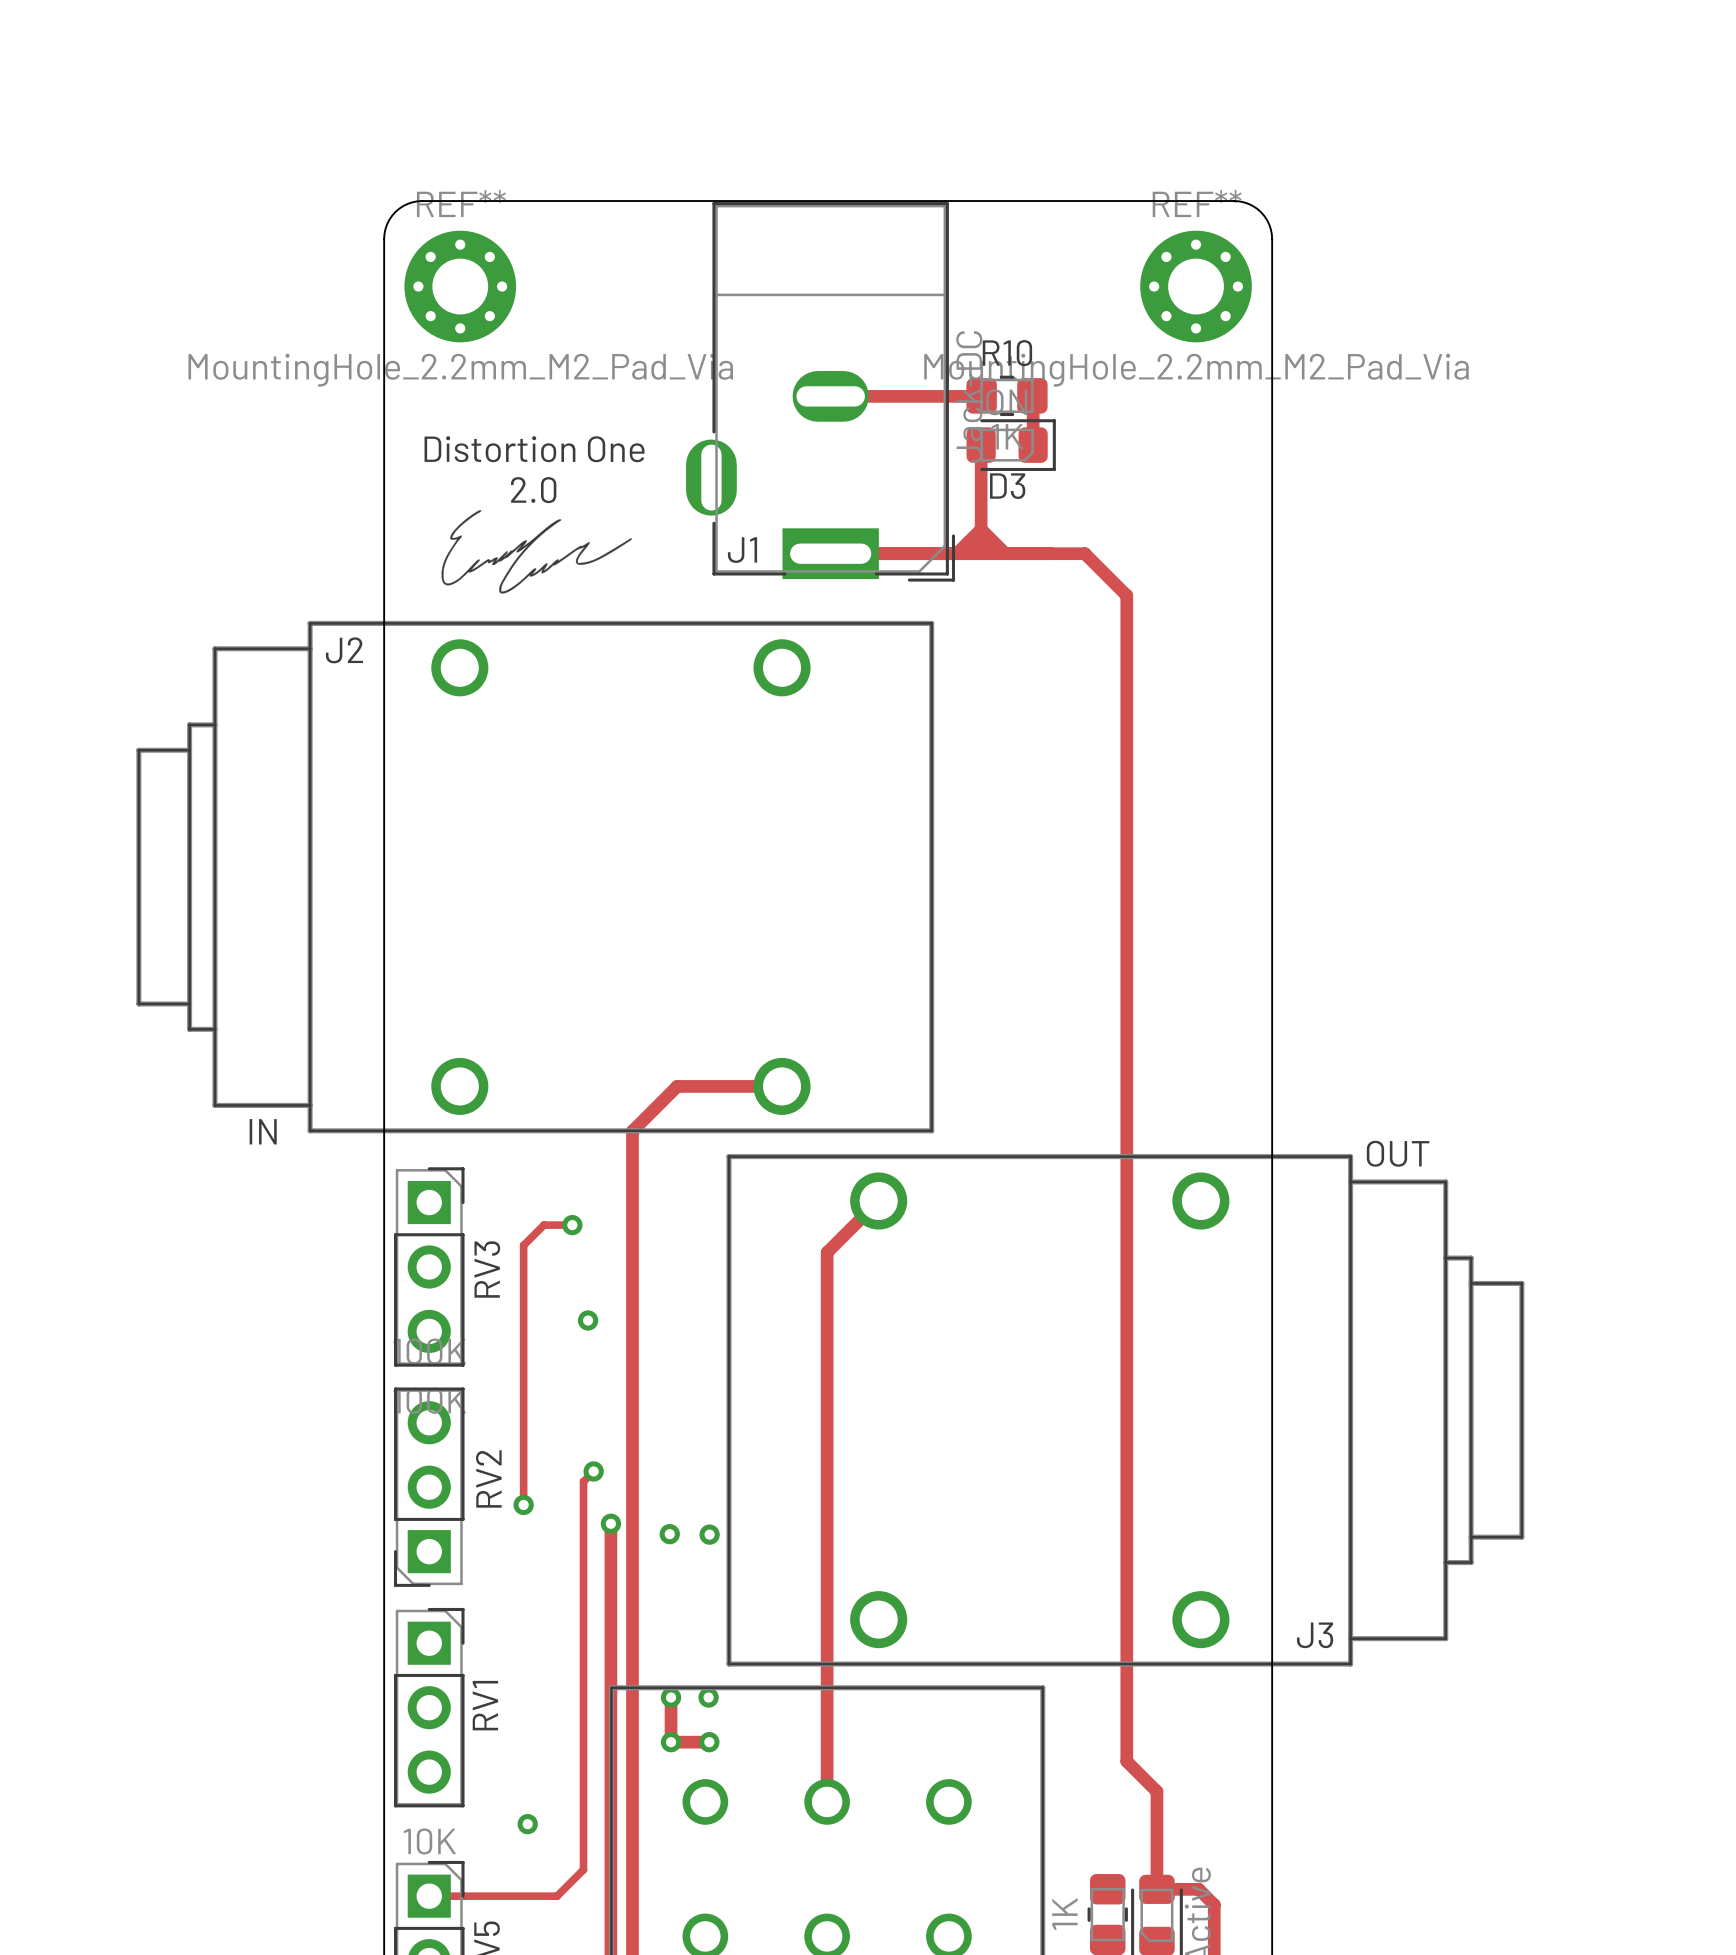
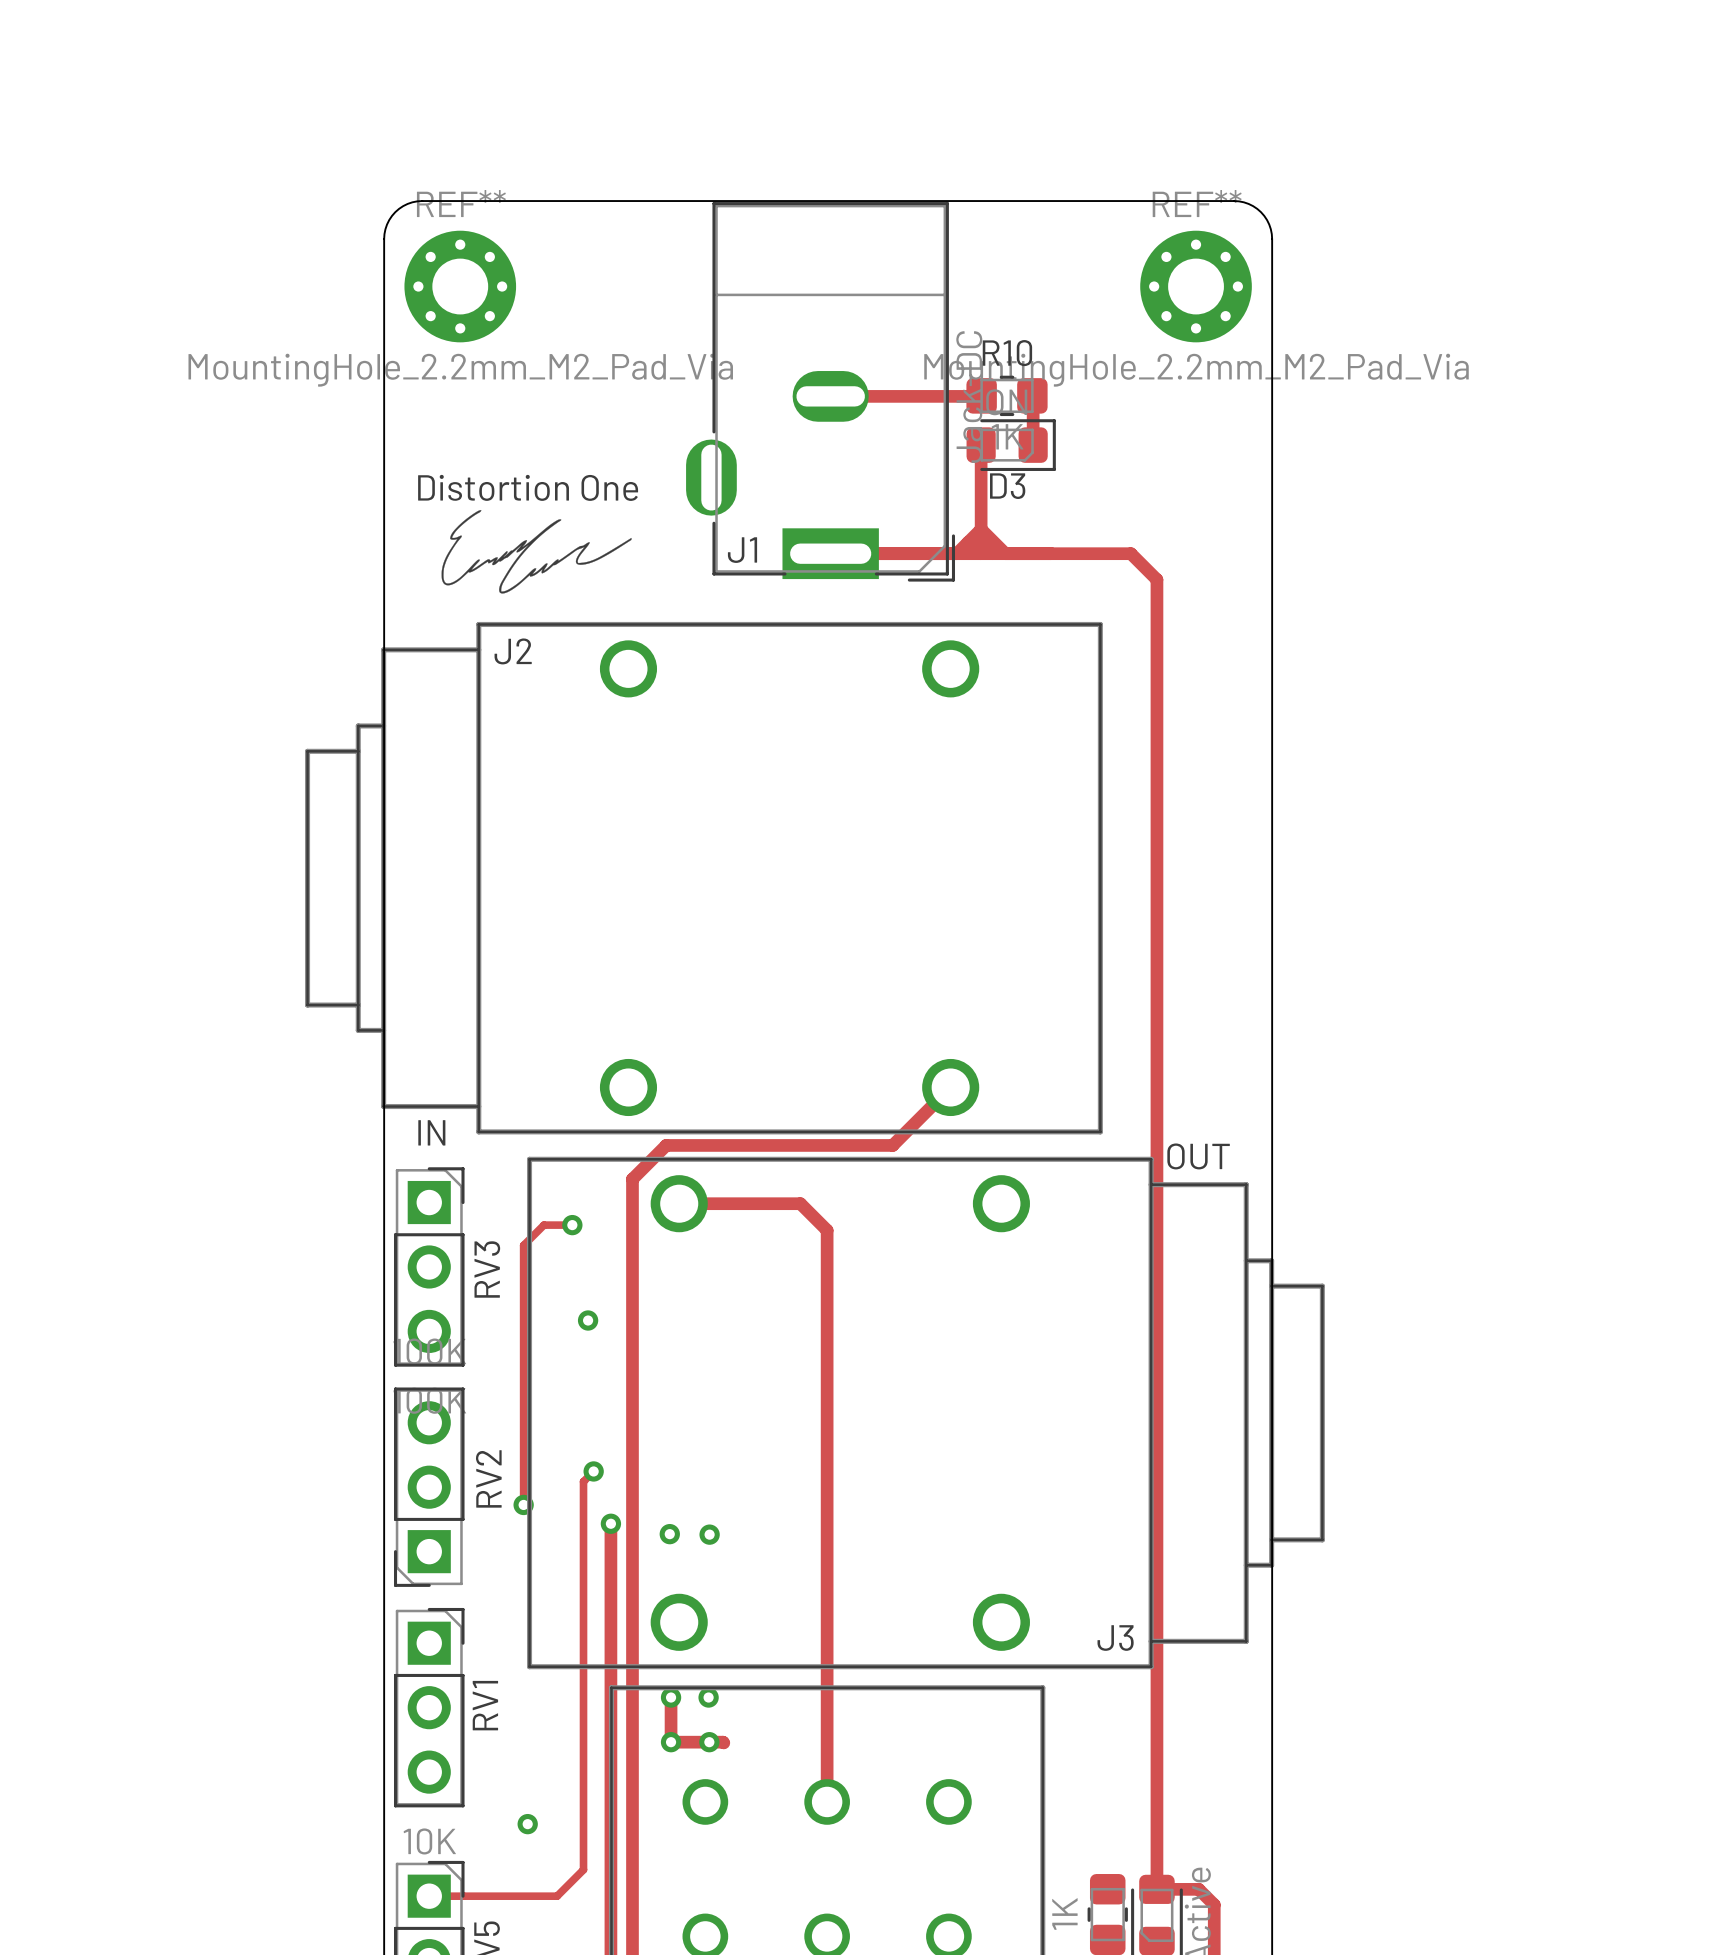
text: Distortion One (534, 449) -> none
text: 2.0 (533, 490) -> Distortion One (528, 487)
track: (1084, 553) (1126, 595) (1126, 1761) (1156, 1791) -> (1084, 553) (1130, 553) (1156, 579) (1156, 1791)
J2 position: (535, 877) -> (703, 878)
track: (782, 1086) (677, 1086) (632, 1131) (632, 1179) -> (950, 1087) (892, 1145) (666, 1145) (632, 1179)
track: (878, 1201) (827, 1252) -> (679, 1203) (800, 1203) (827, 1230) (827, 1252)
J3 position: (1125, 1410) -> (925, 1413)
track: none -> (709, 1742) (723, 1742)

